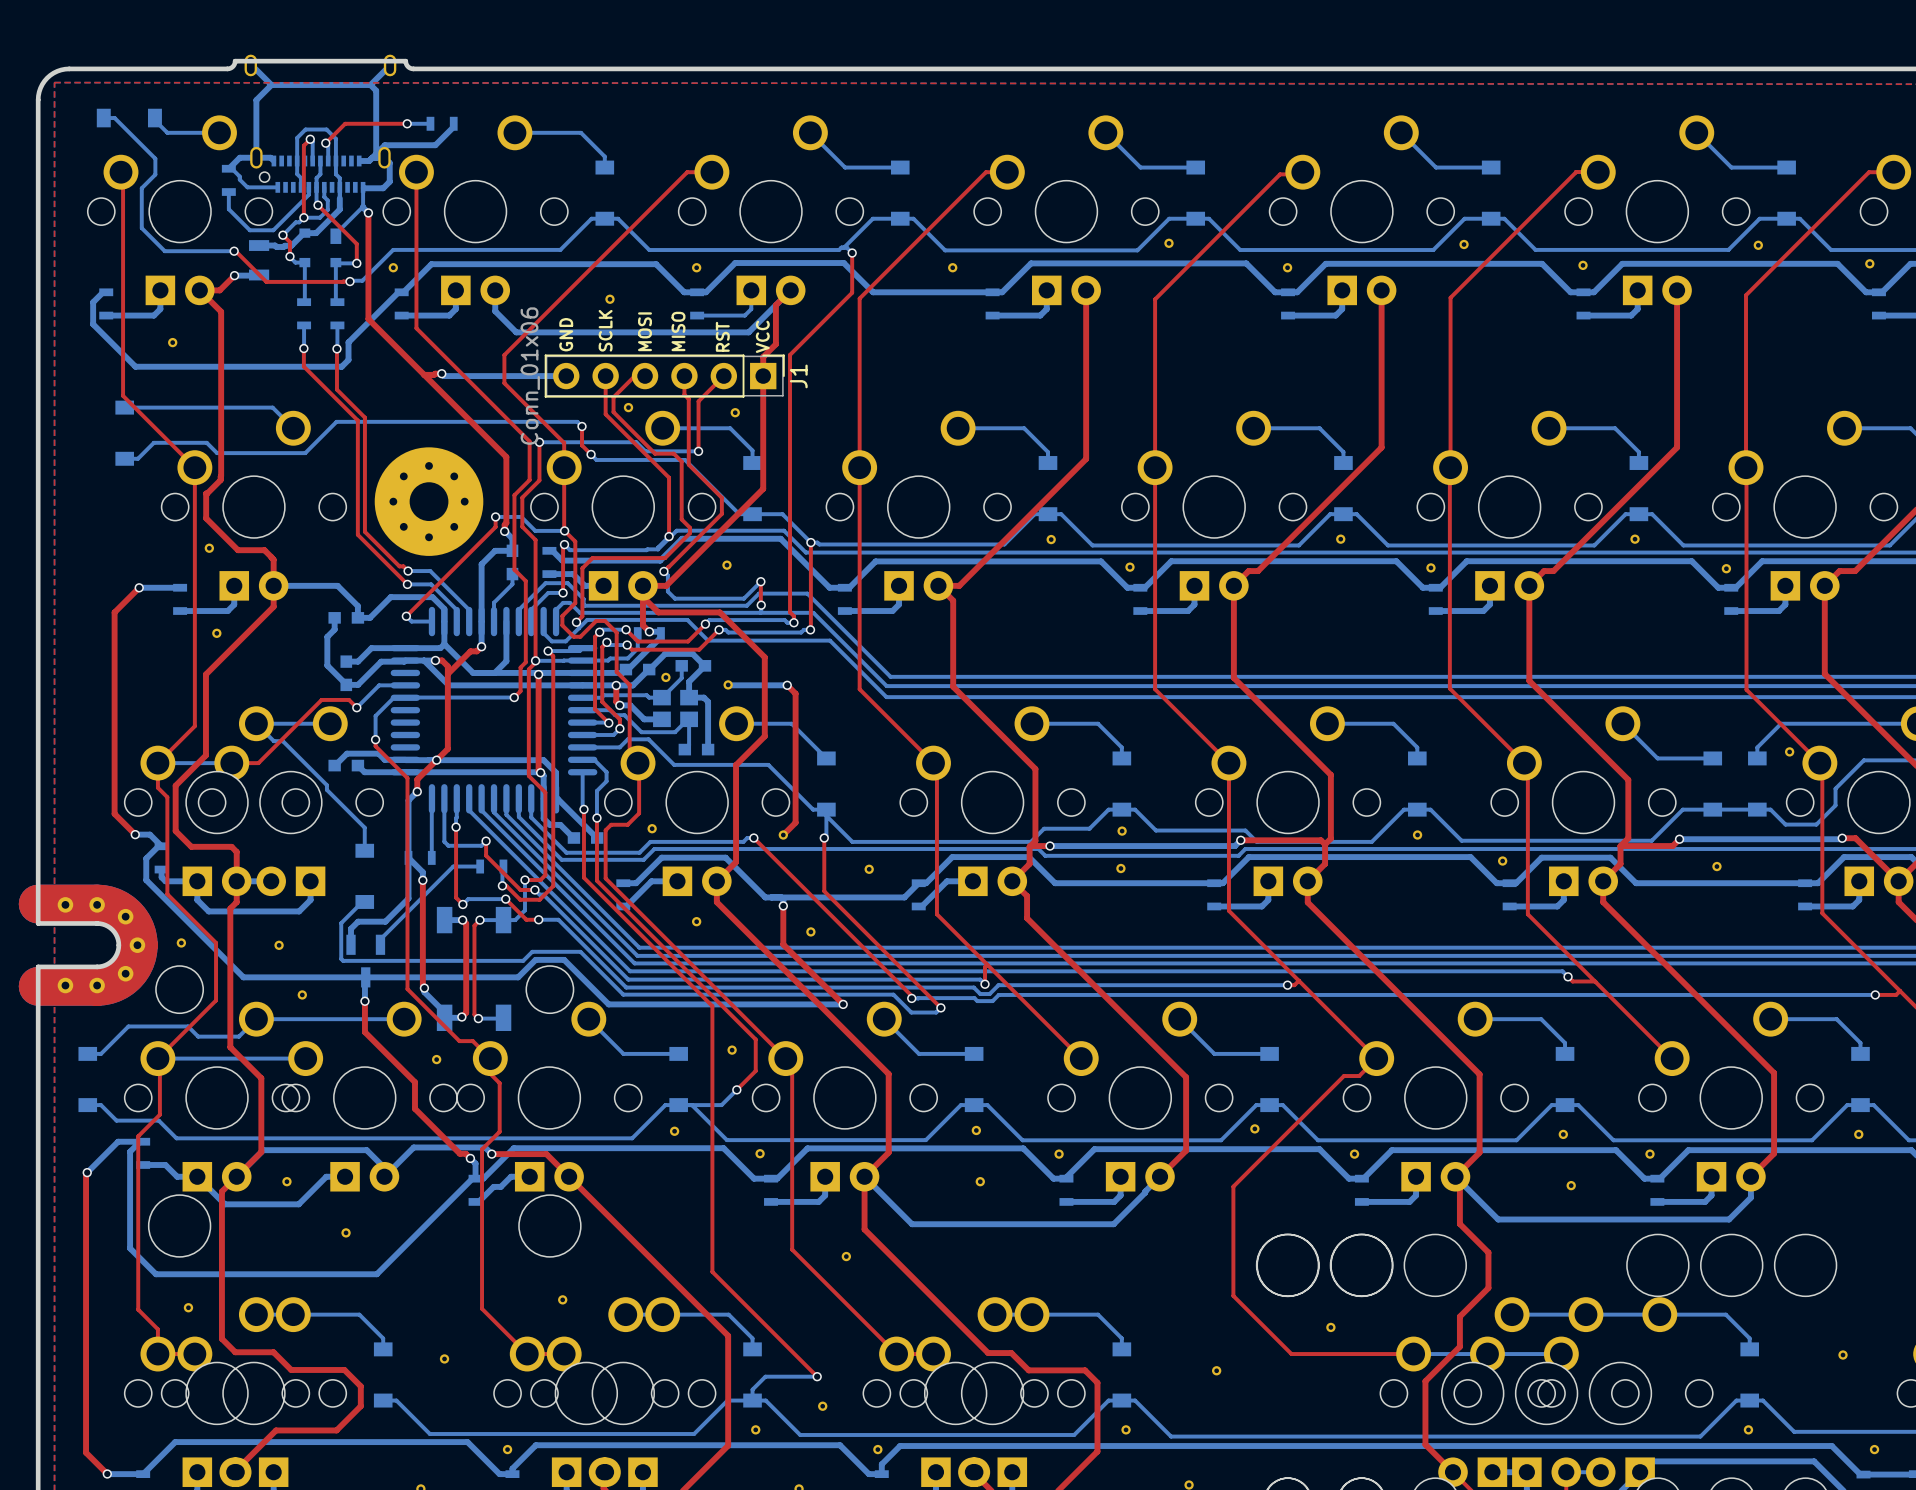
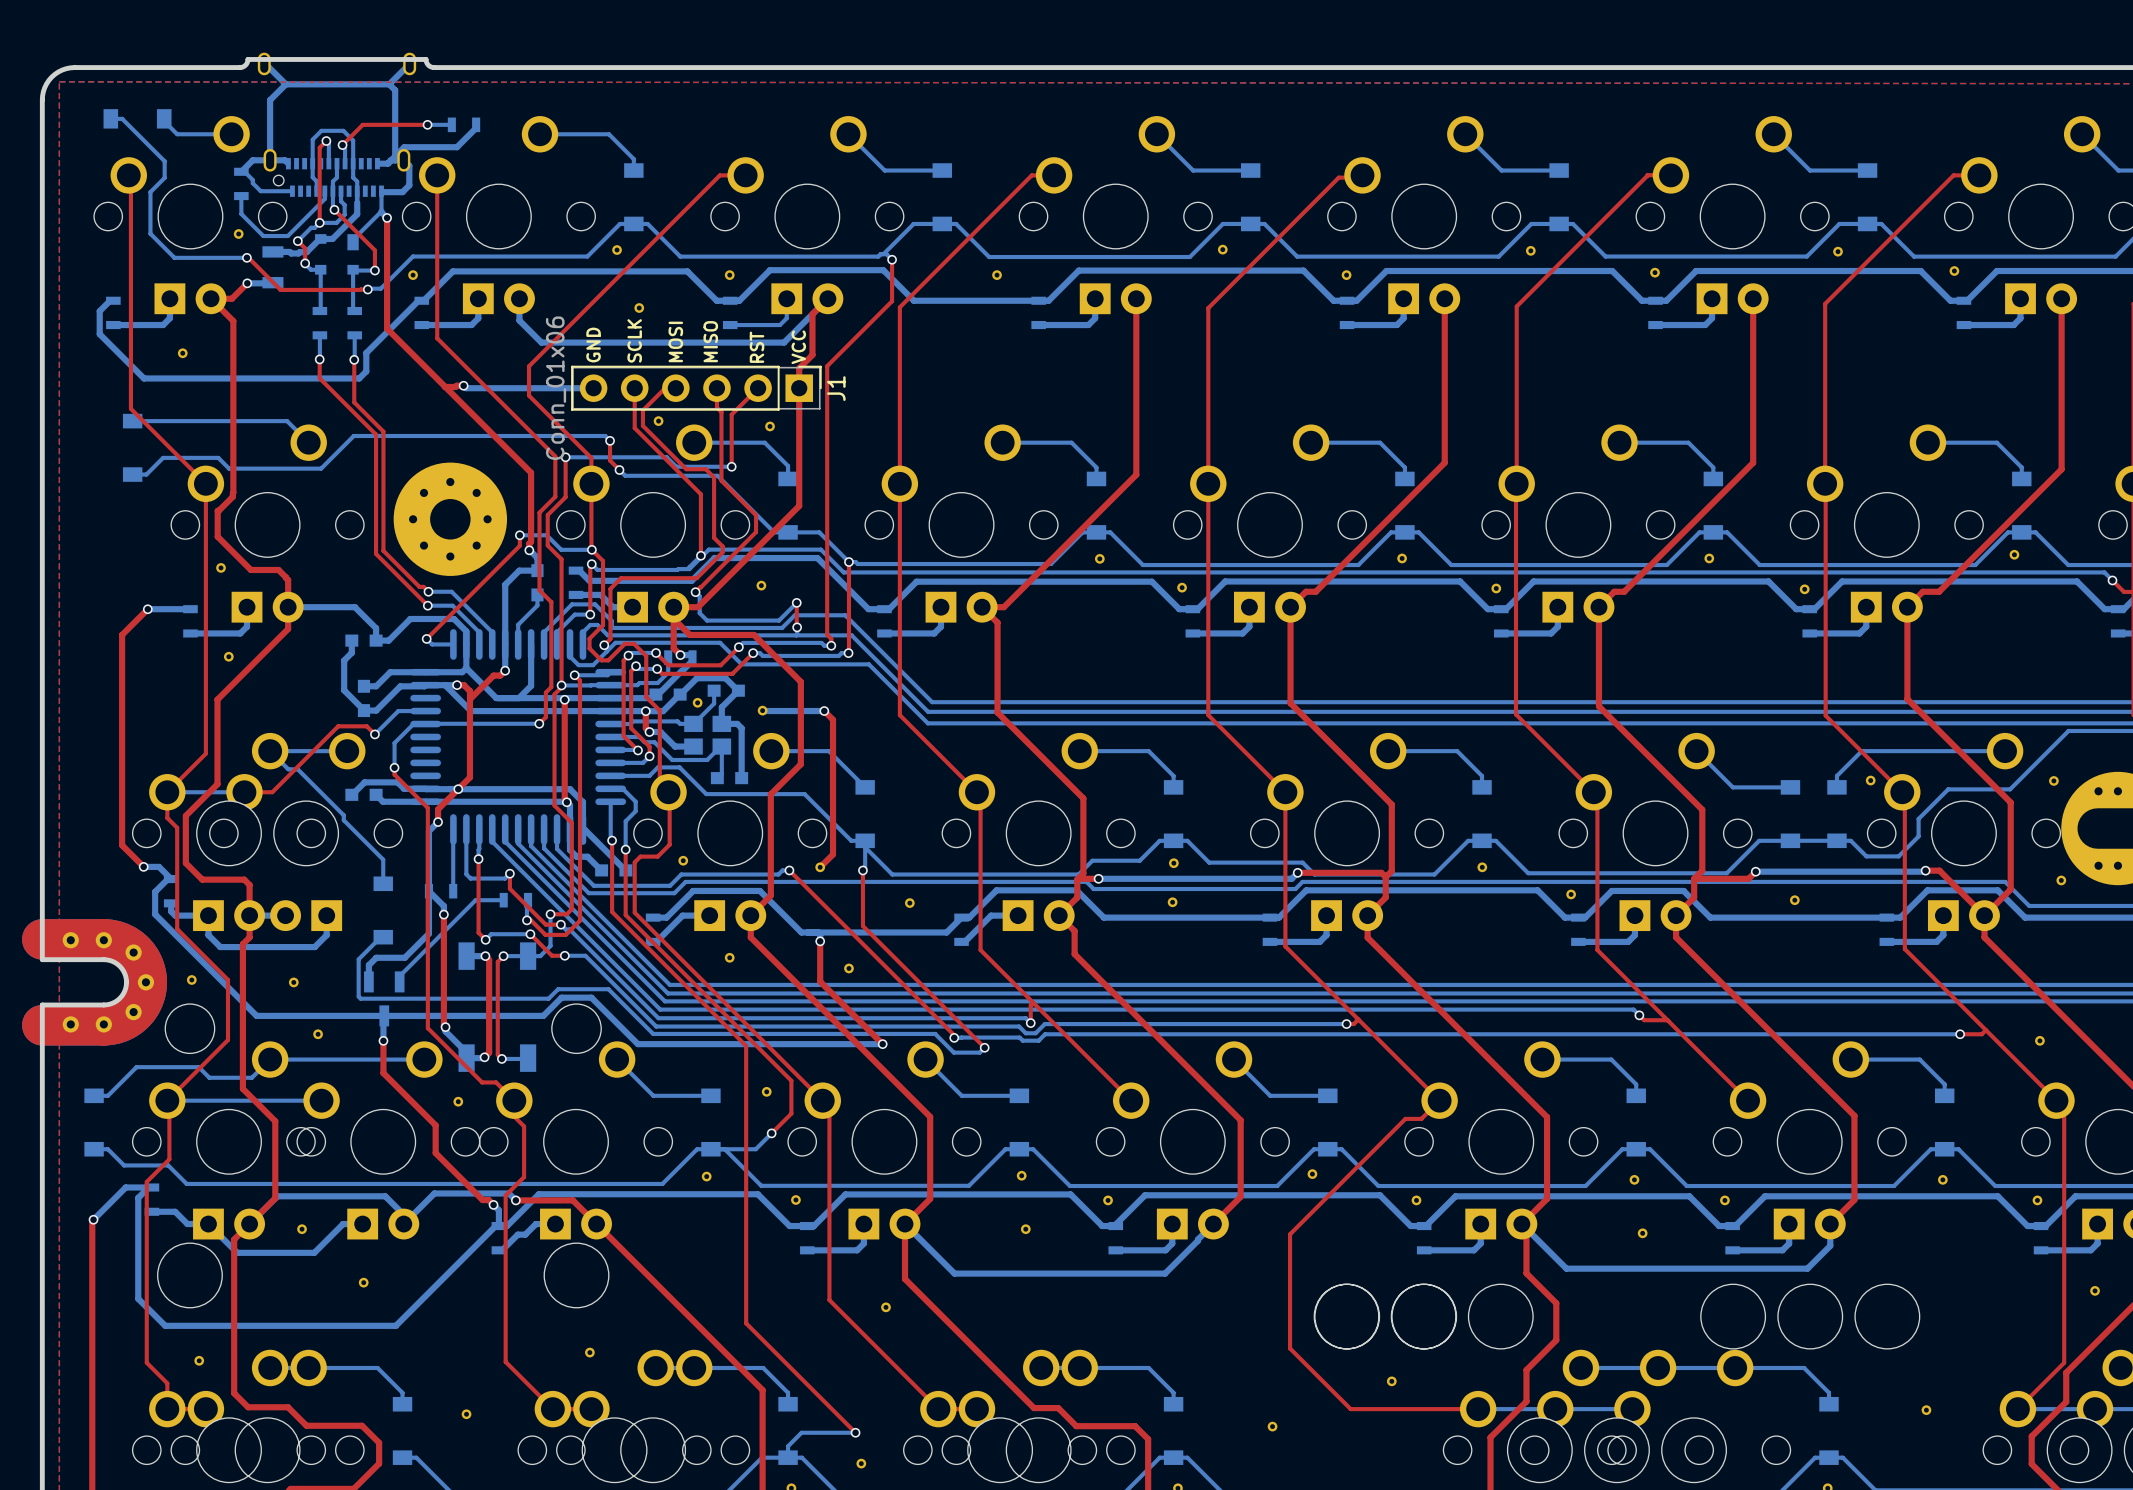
part: none -> (238, 233)
part: none -> (617, 250)

